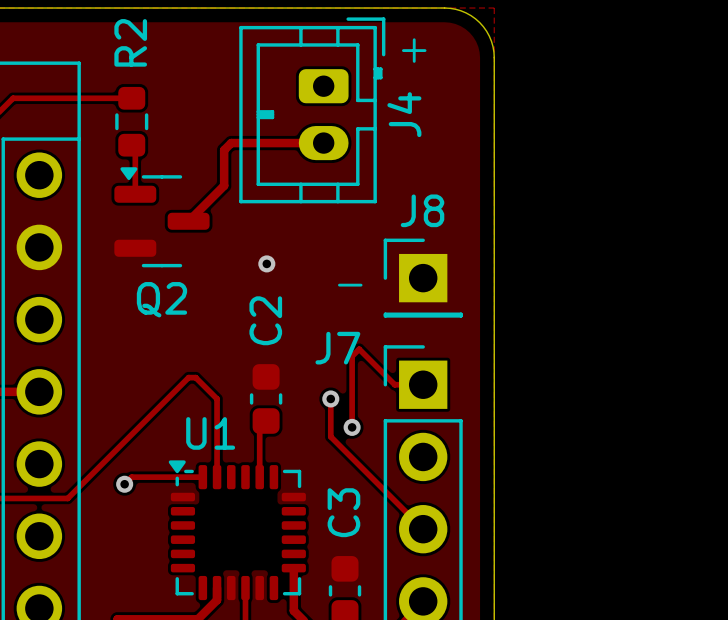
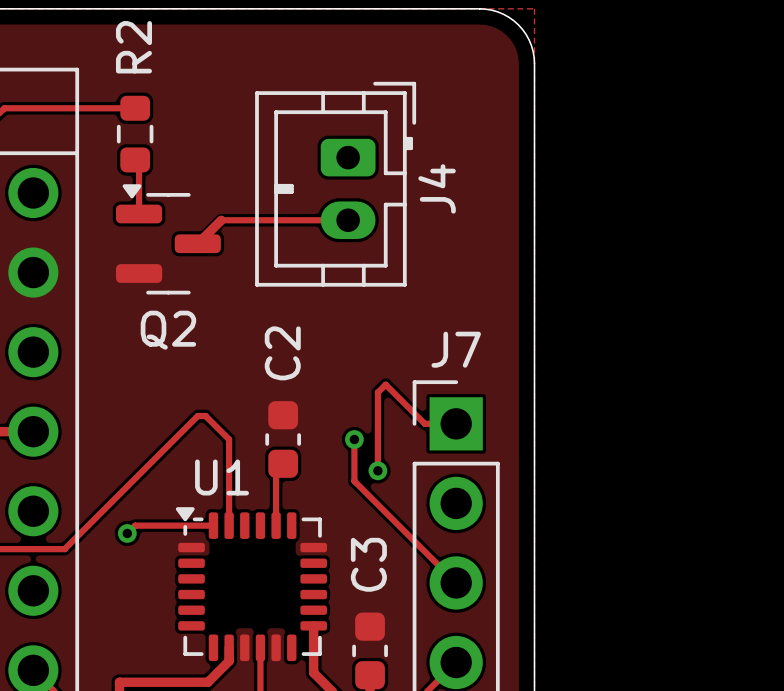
text: + (414, 50) -> none
J4 position: (312, 110) -> (335, 184)
track: (323, 143) (231, 143) (224, 150) (224, 185) (209, 199) -> (348, 220) (221, 220)
via: (266, 263) -> none
J8: (423, 278) -> none
text: - (350, 285) -> none
J7 name position: J7 (337, 348) -> J7 (456, 349)

